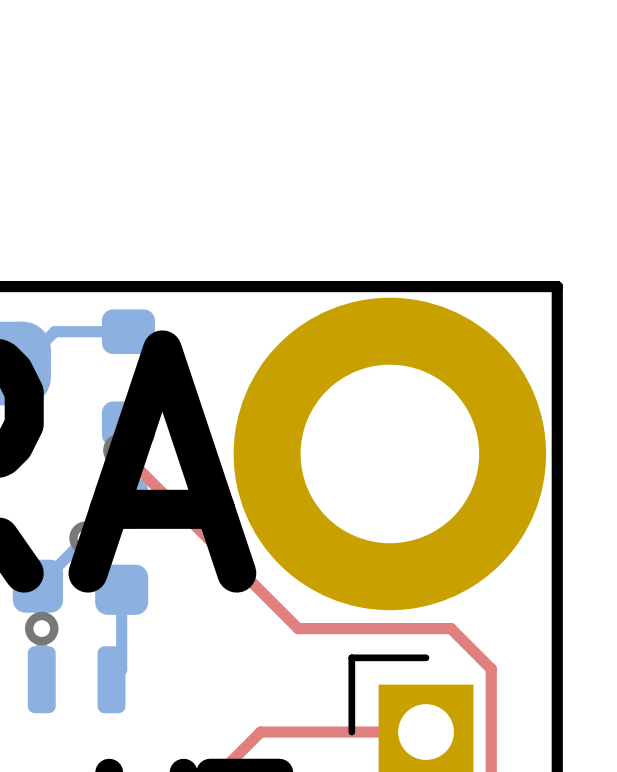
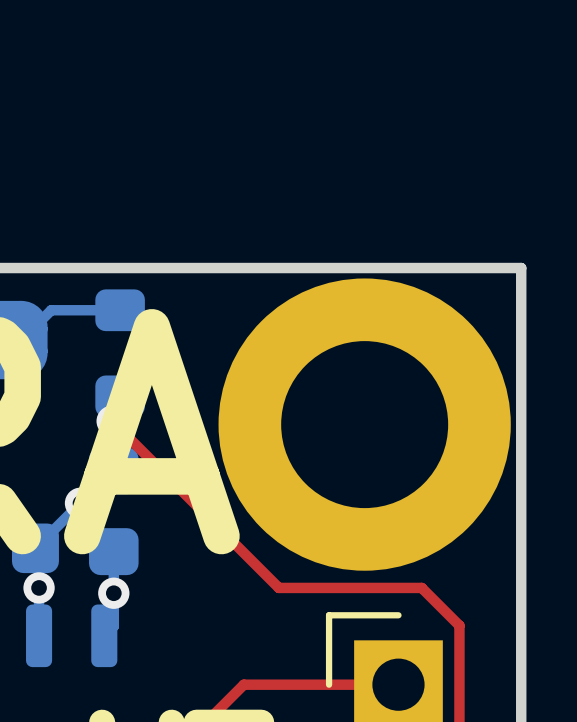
via: none -> (113, 593)

